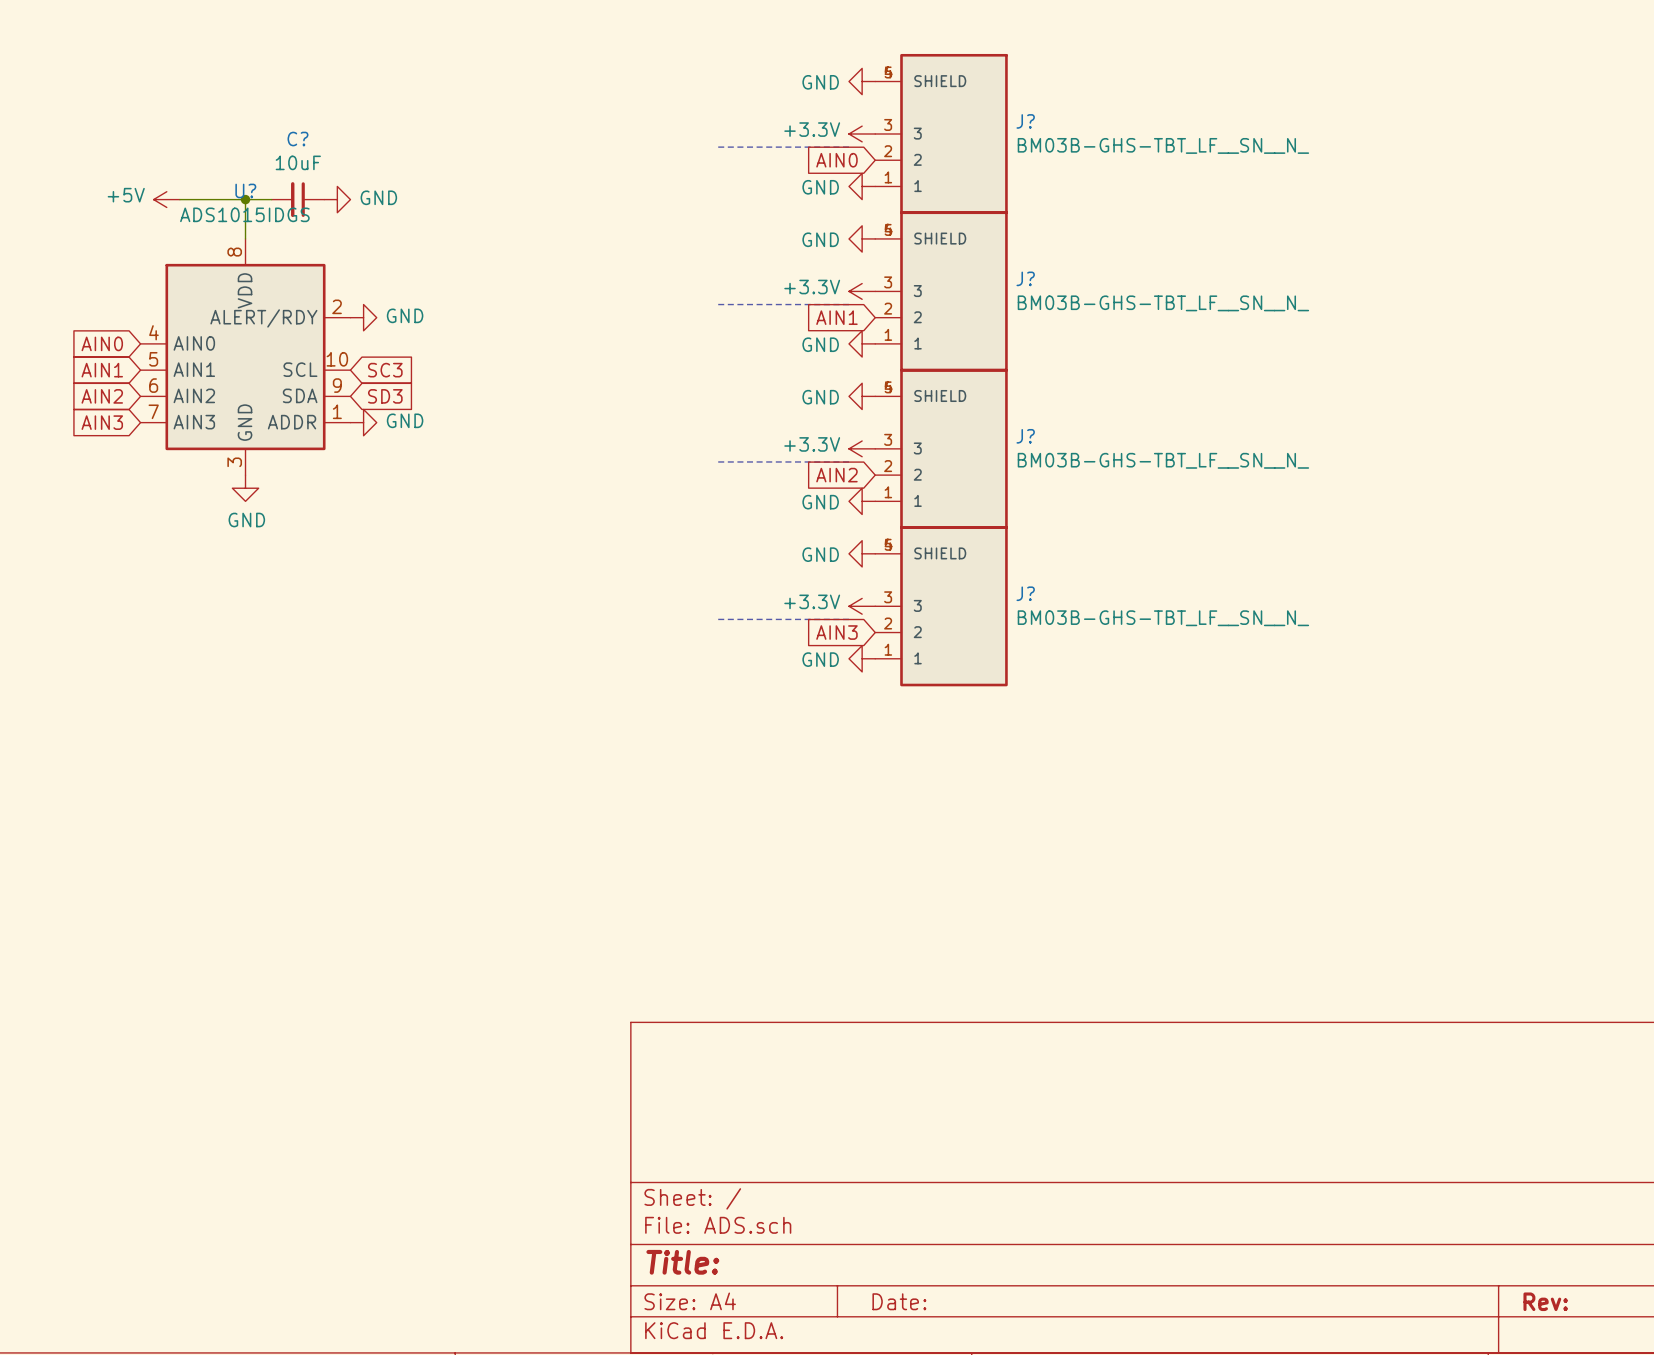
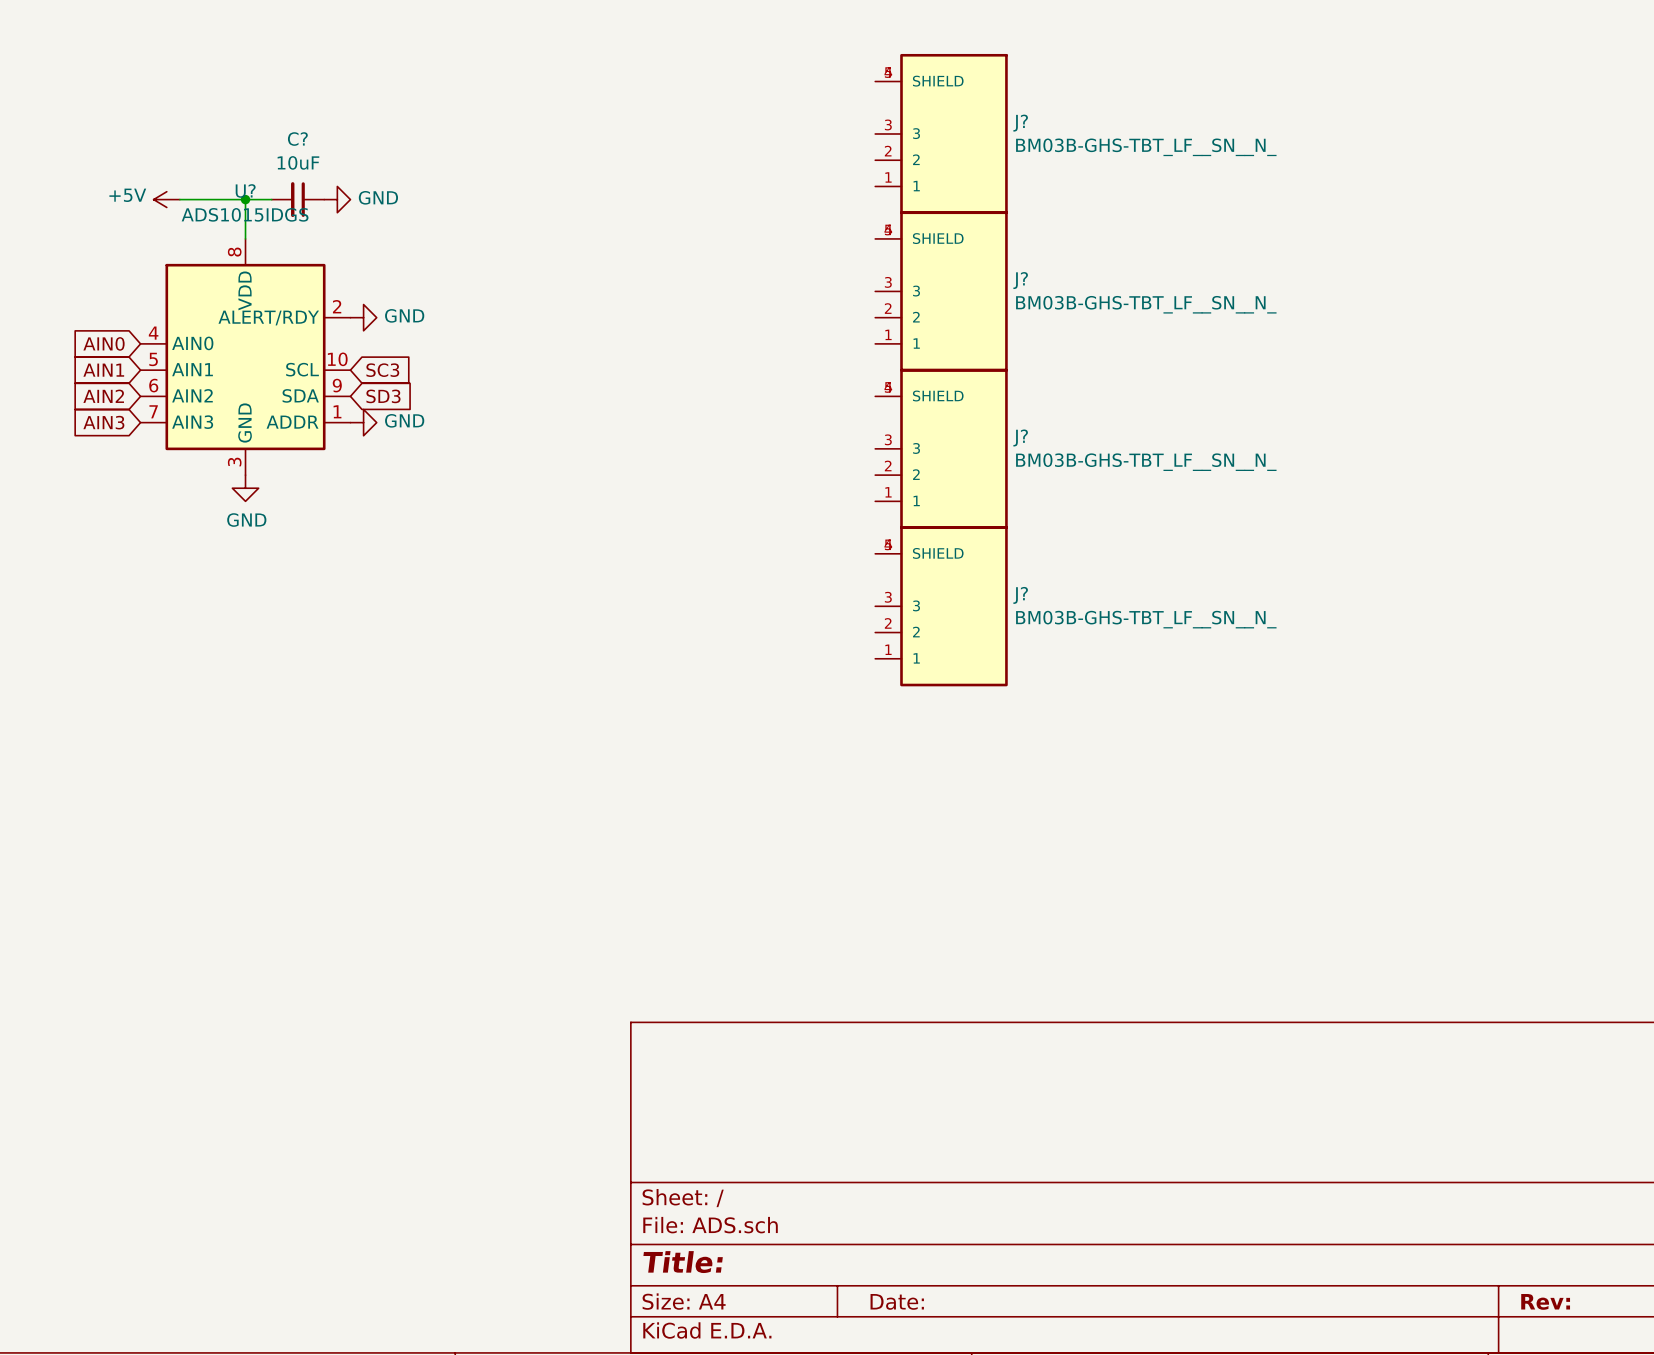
power symbol: GND (862, 81) -> none
power symbol: +3.3V (862, 133) -> none
line: (717, 147) (849, 147) -> none
global label: AIN0 (836, 160) -> none
power symbol: GND (862, 186) -> none
power symbol: GND (862, 238) -> none
power symbol: +3.3V (862, 291) -> none
line: (717, 304) (849, 304) -> none
global label: AIN1 (836, 317) -> none
power symbol: GND (862, 343) -> none
power symbol: GND (862, 396) -> none
power symbol: +3.3V (862, 448) -> none
line: (717, 461) (849, 461) -> none
global label: AIN2 (836, 475) -> none
power symbol: GND (862, 501) -> none
power symbol: GND (862, 553) -> none
power symbol: +3.3V (862, 606) -> none
line: (717, 619) (849, 619) -> none
global label: AIN3 (836, 632) -> none
power symbol: GND (862, 658) -> none

